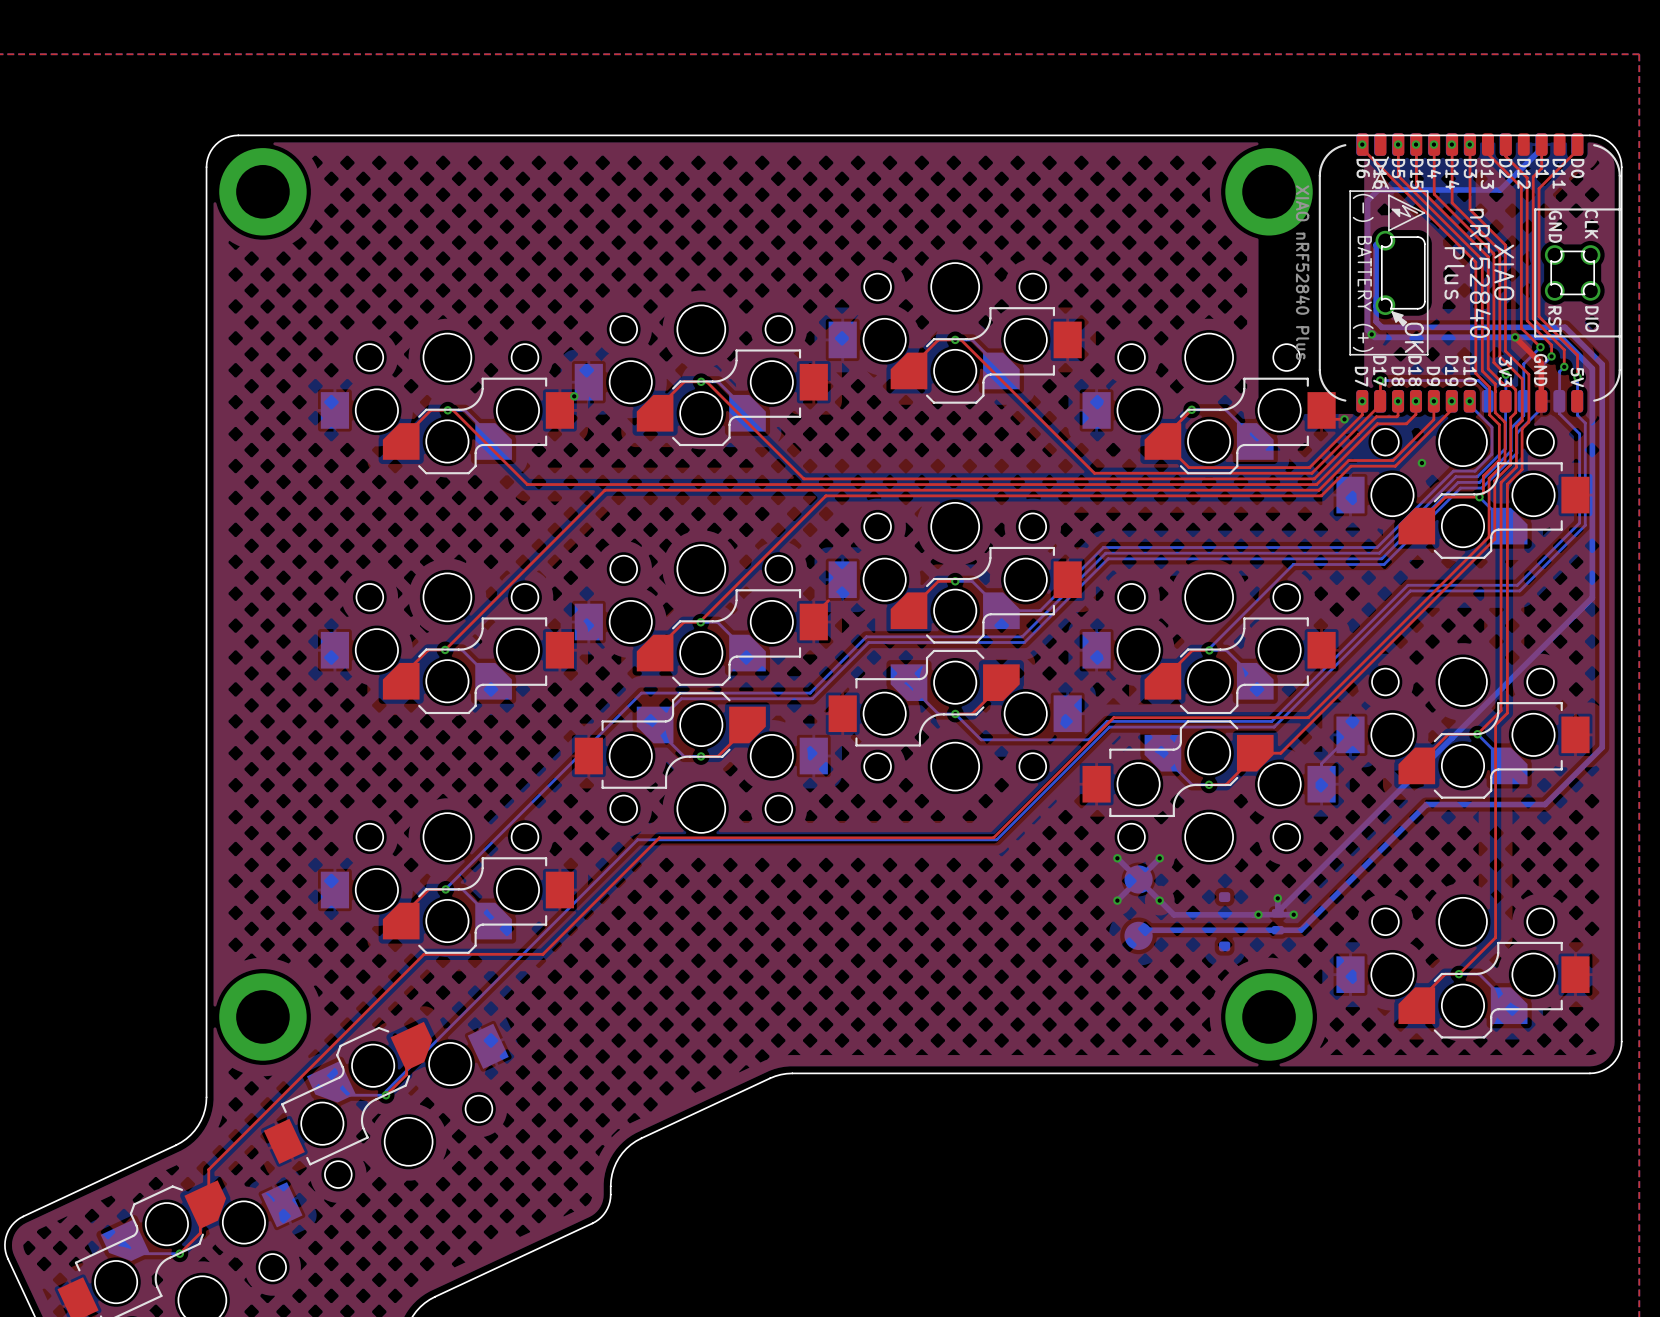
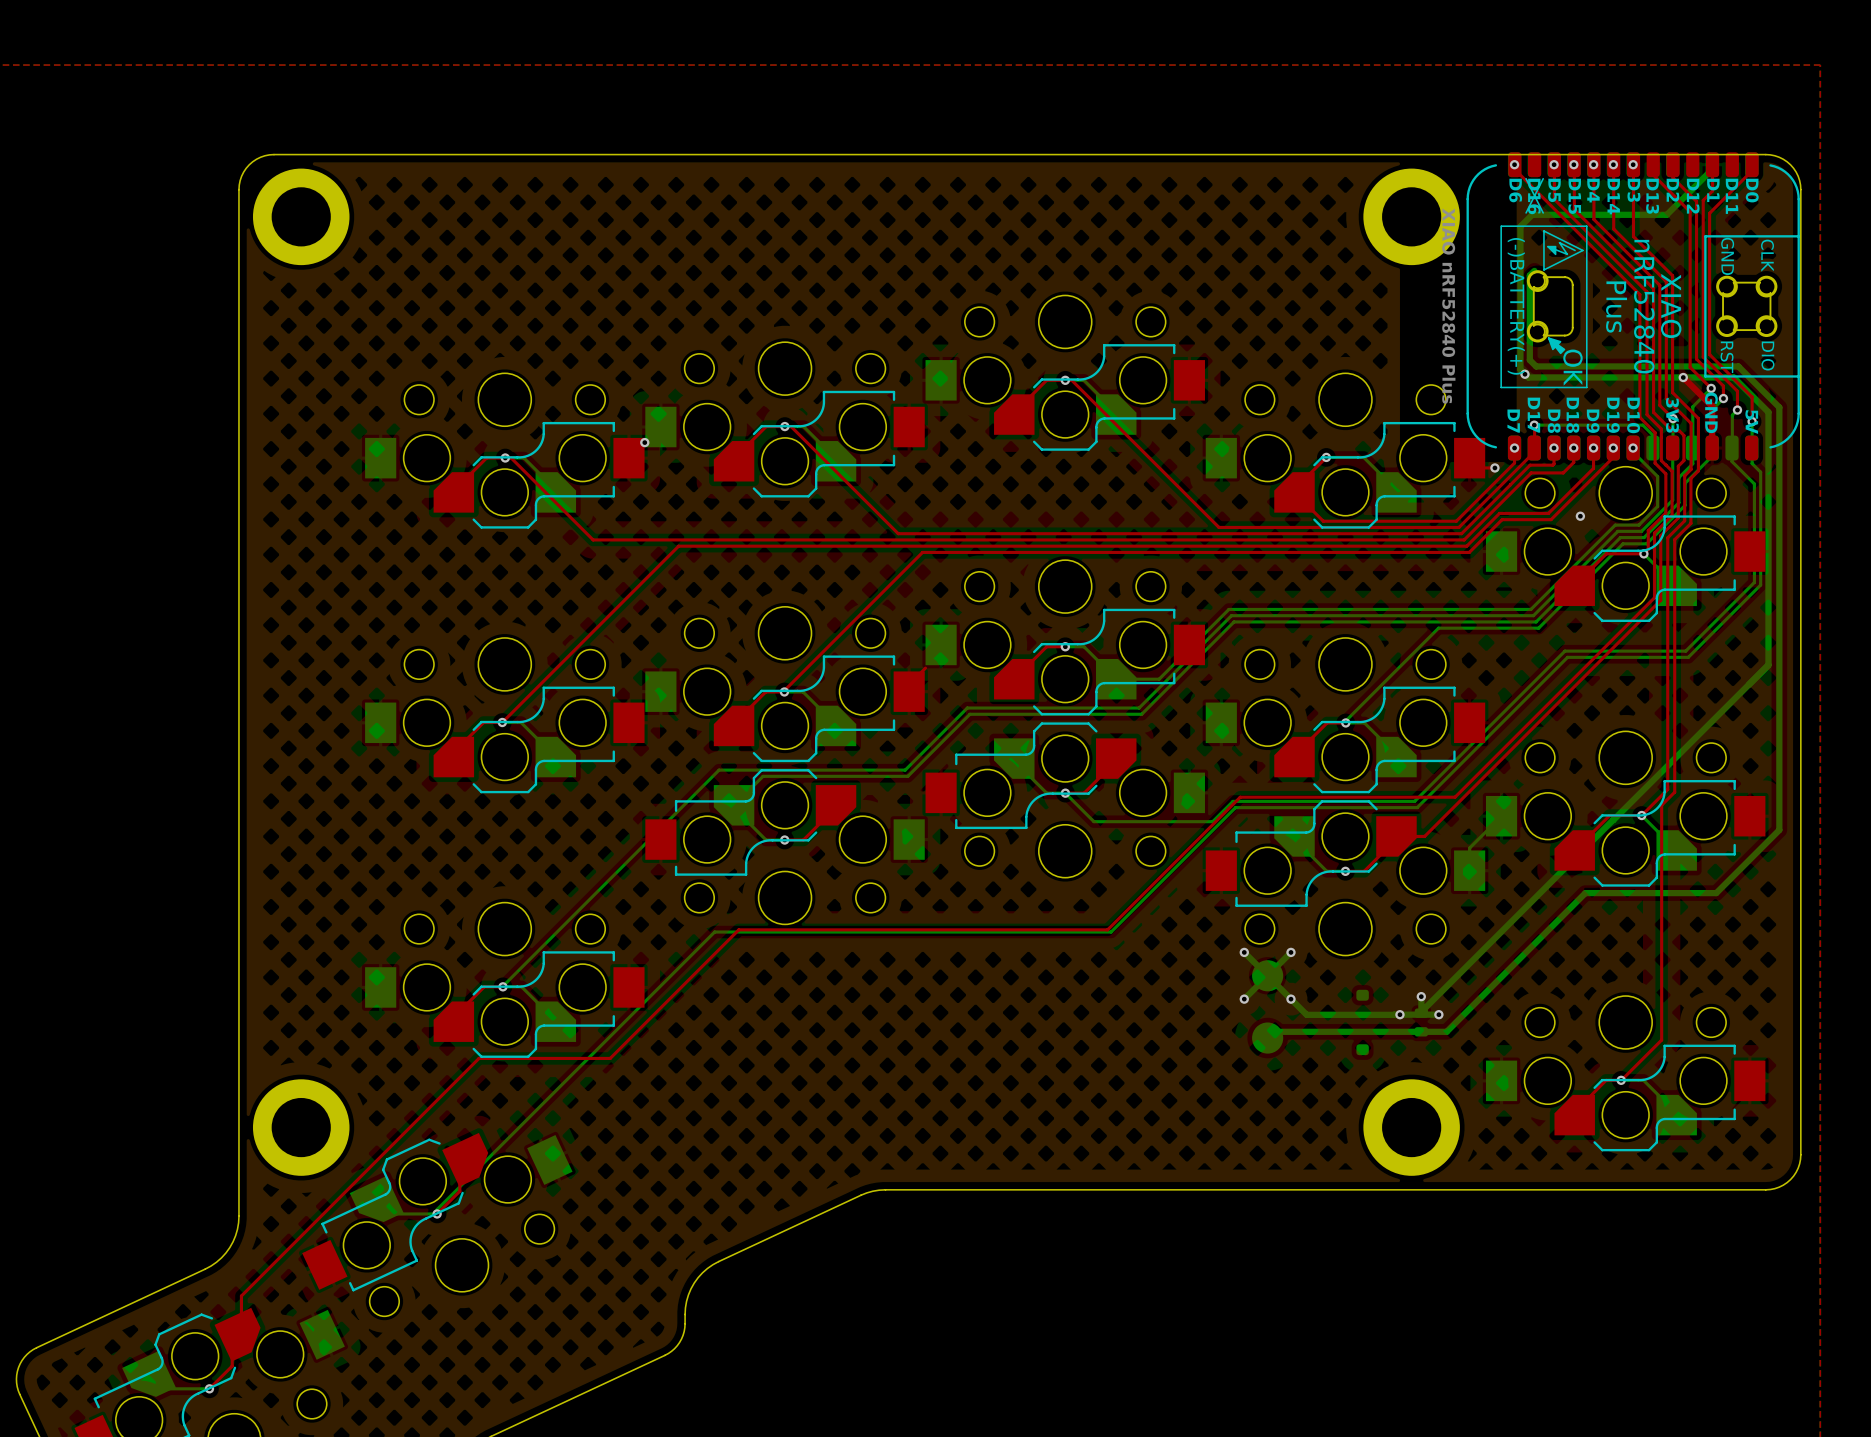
part footprint: [1318, 133, 1621, 413] -> [1466, 152, 1800, 461]

